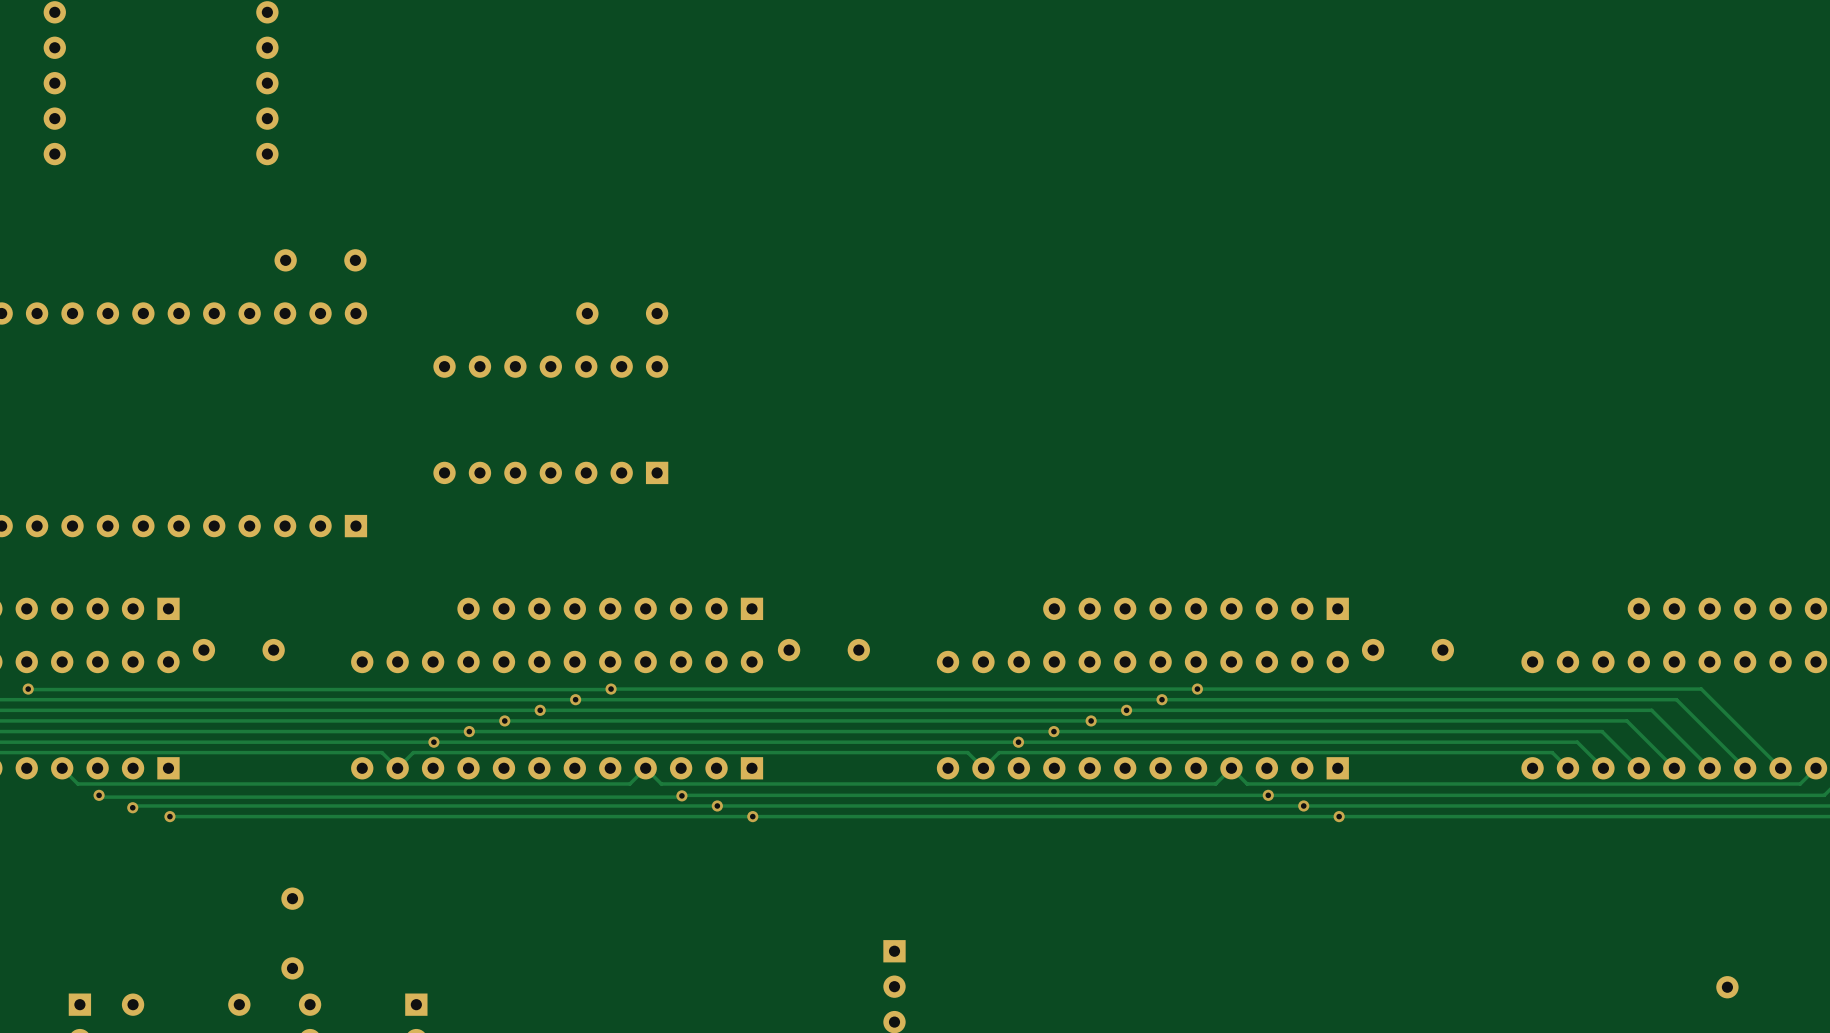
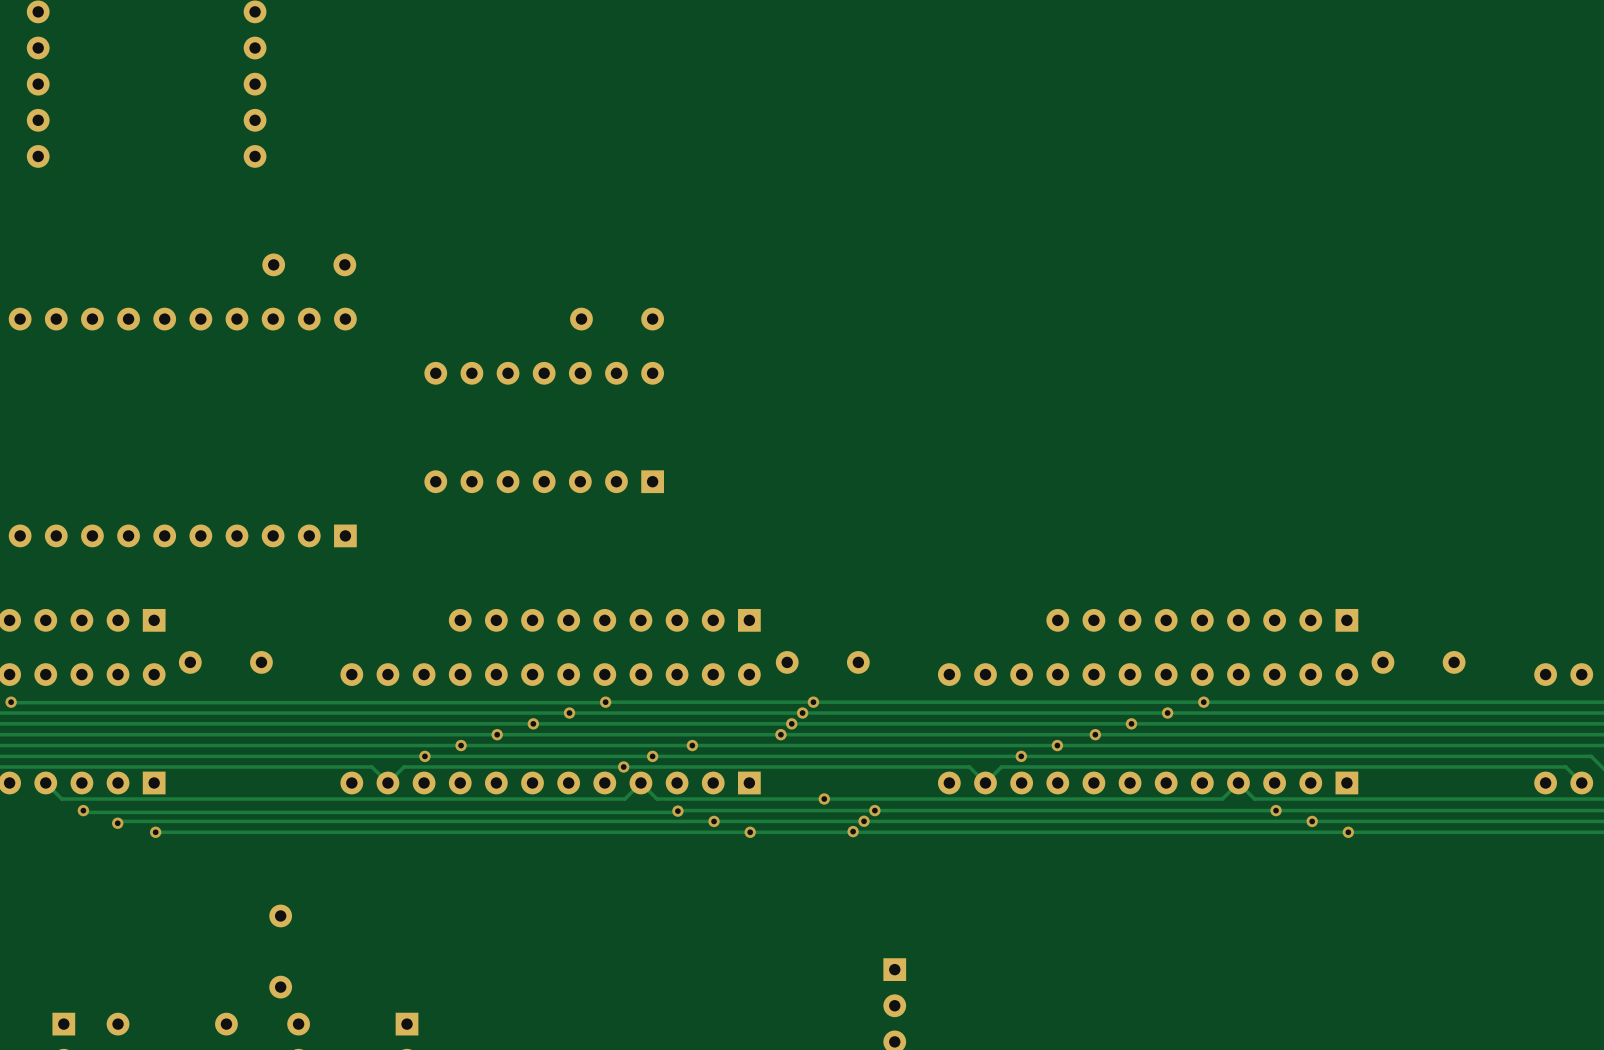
via: none -> (813, 702)
via: none -> (802, 713)
via: none -> (791, 723)
via: none -> (780, 734)
via: none -> (692, 745)
via: none -> (652, 756)
via: none -> (623, 766)
via: none -> (824, 799)
via: none -> (874, 810)
via: none -> (864, 821)
via: none -> (853, 831)

